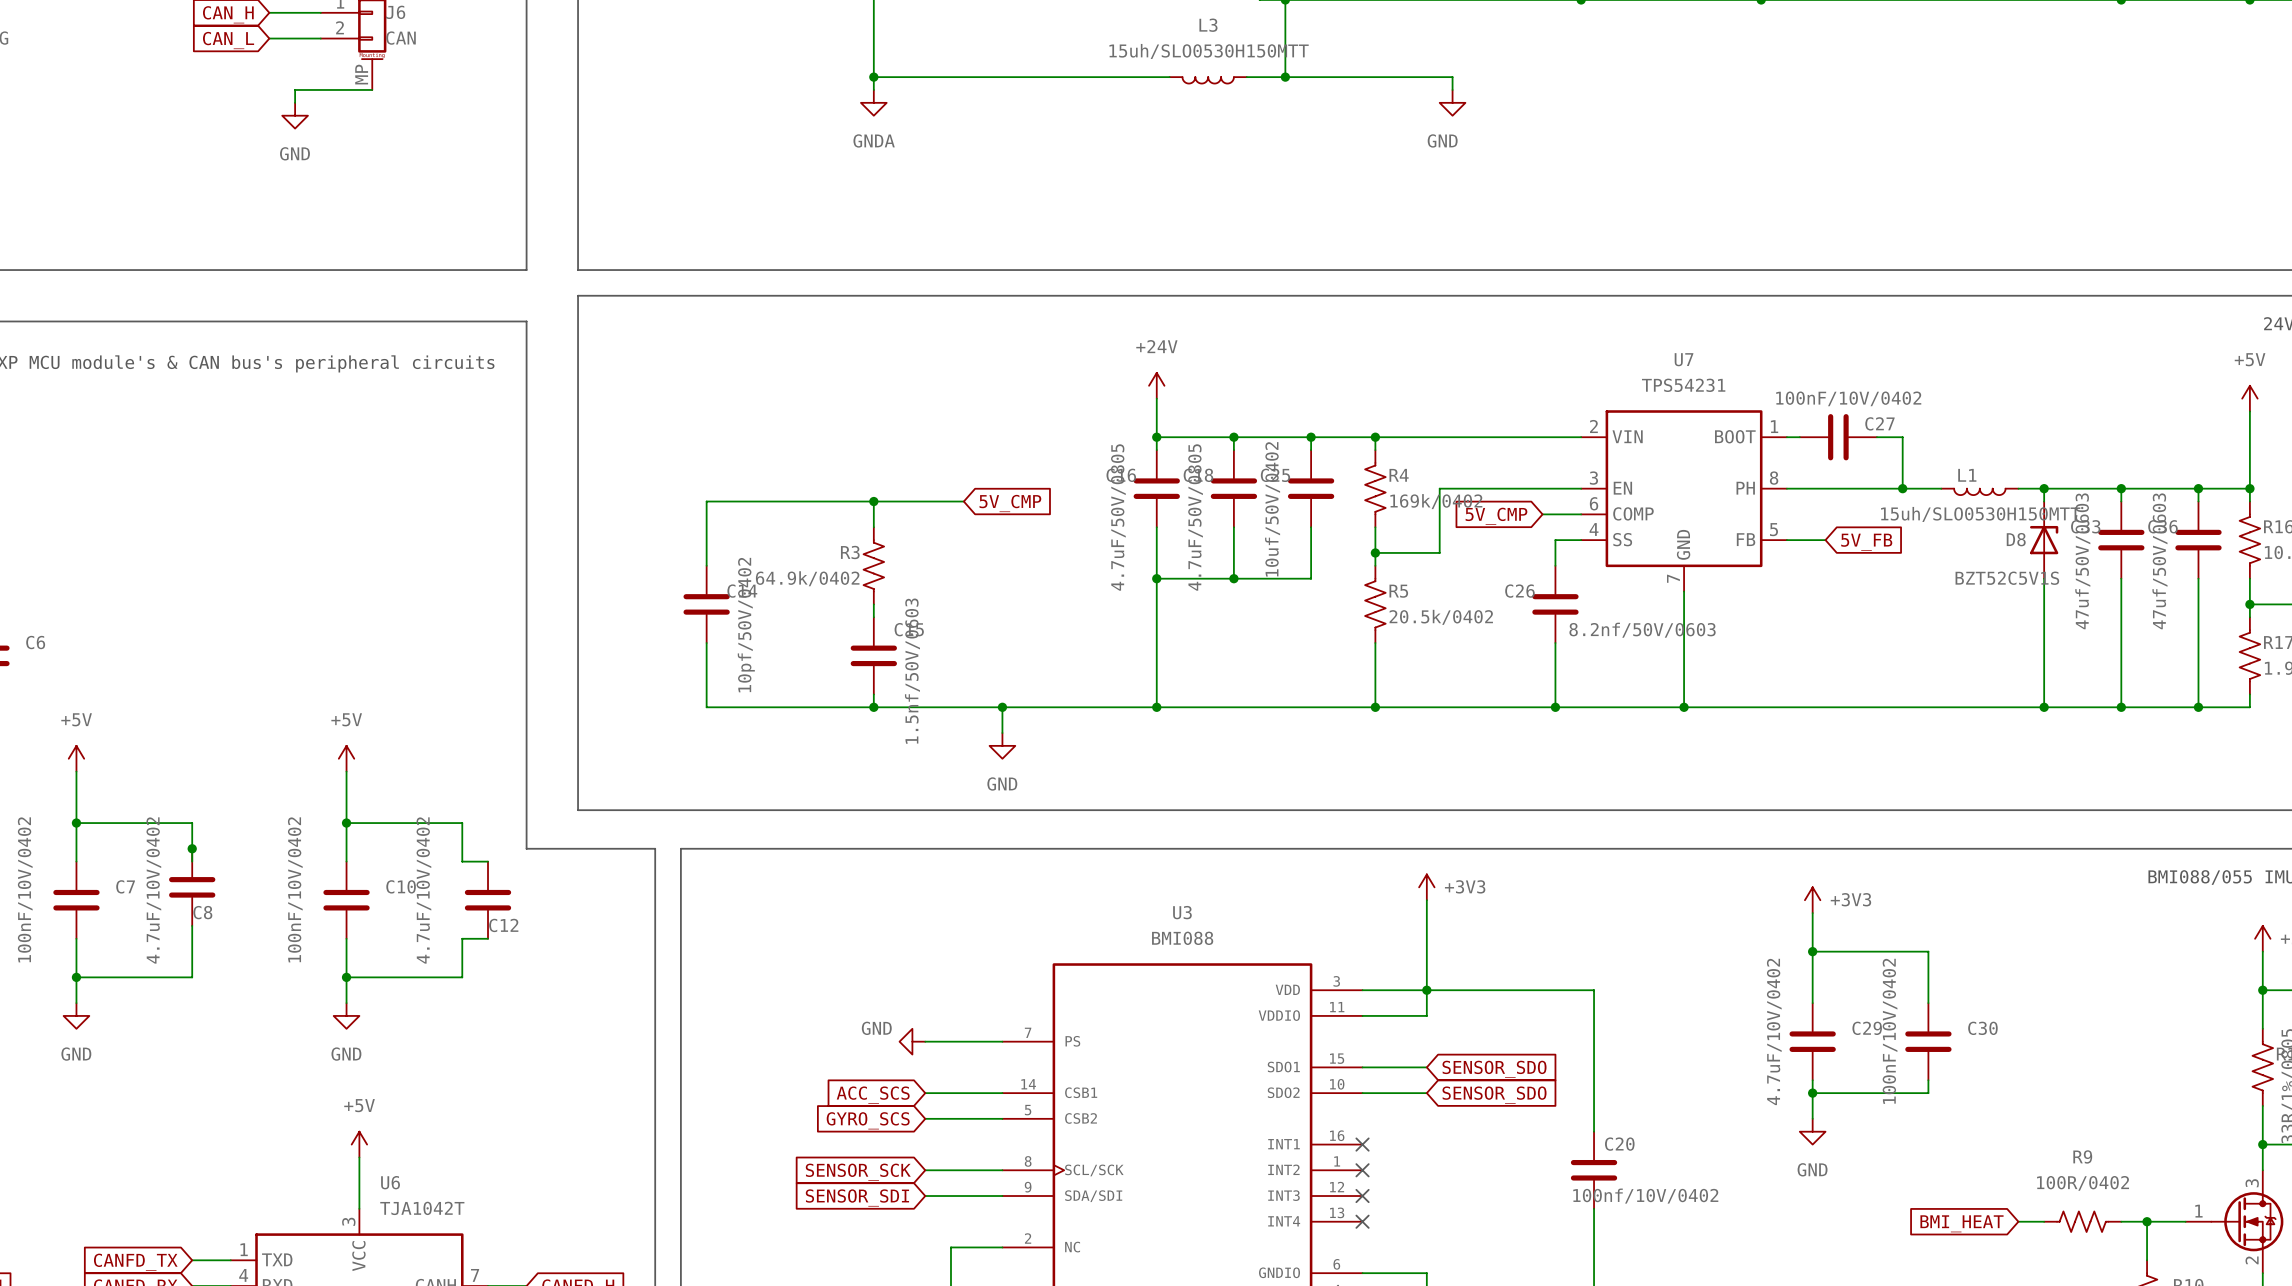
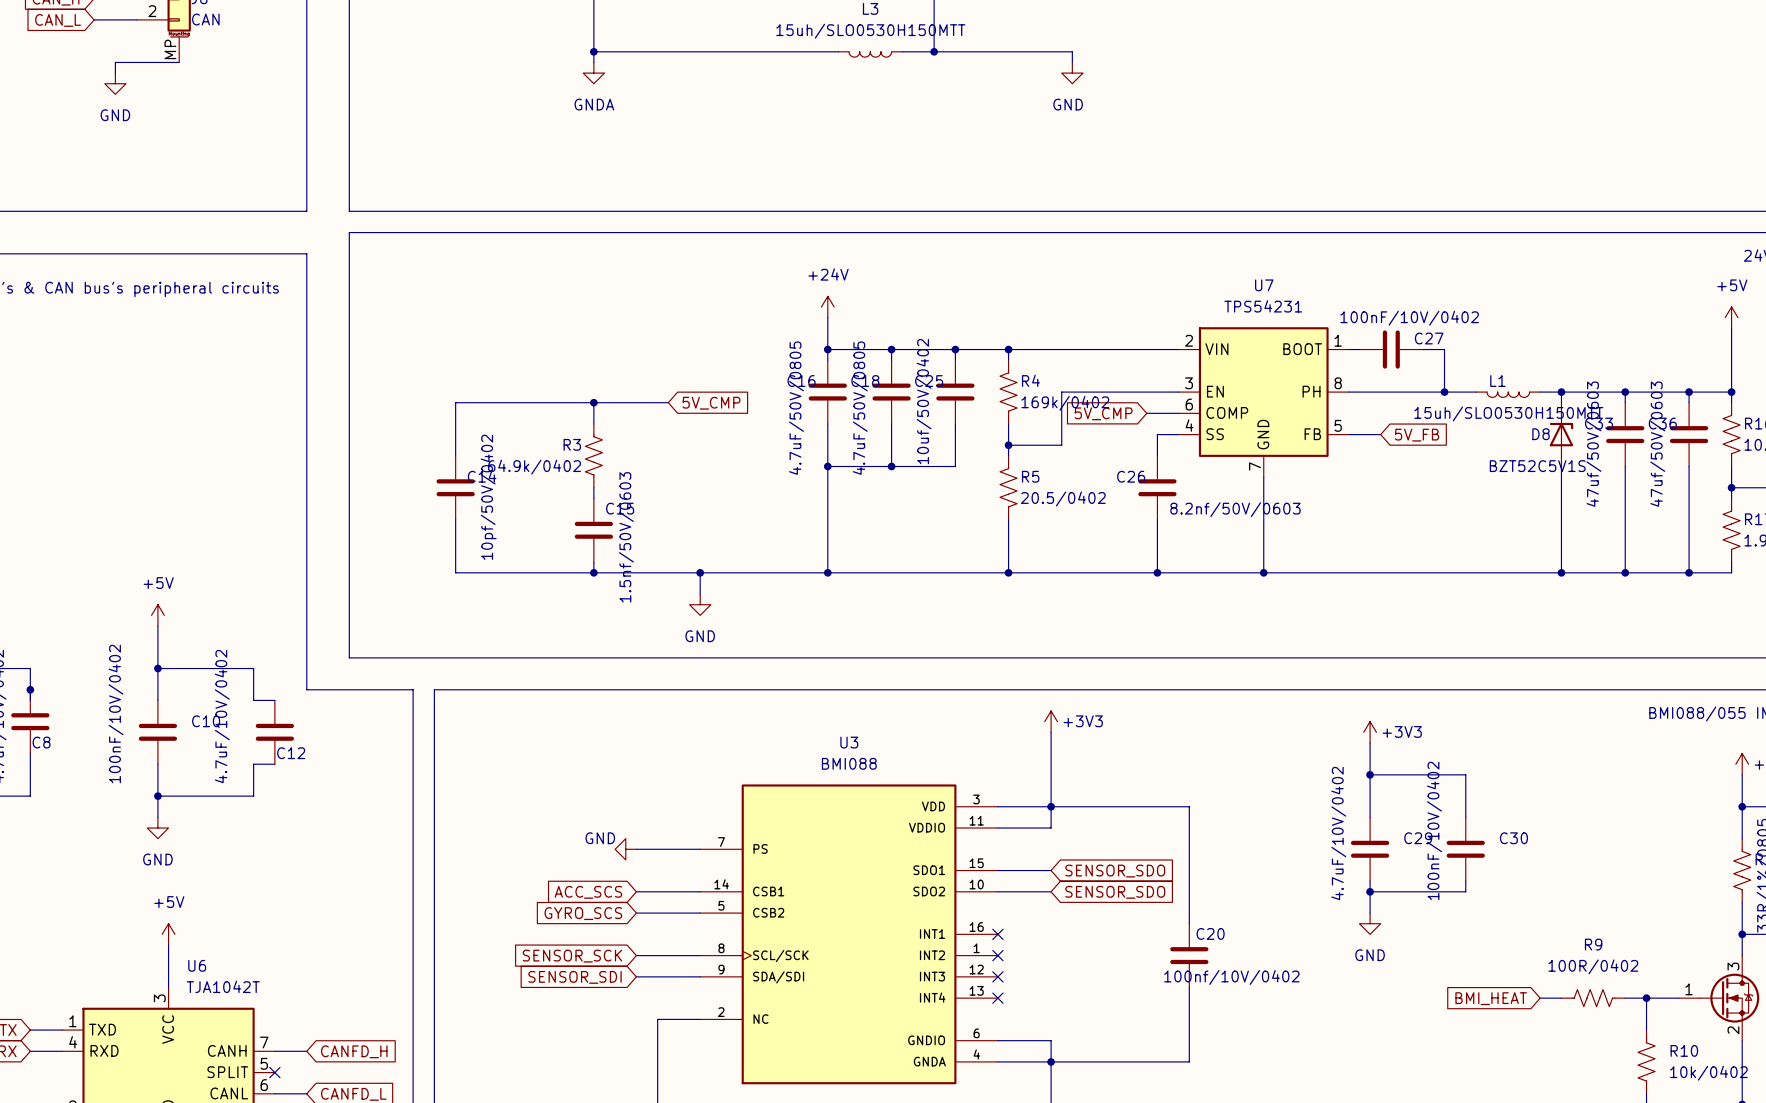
R5 value: 20.5k/0402 (1441, 617) -> 20.5/0402 (1063, 499)

